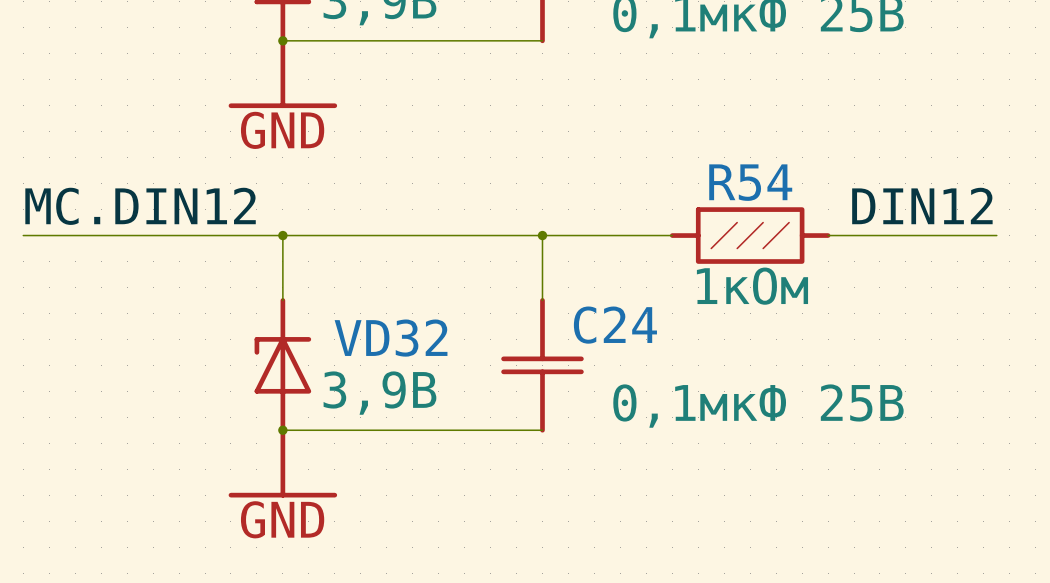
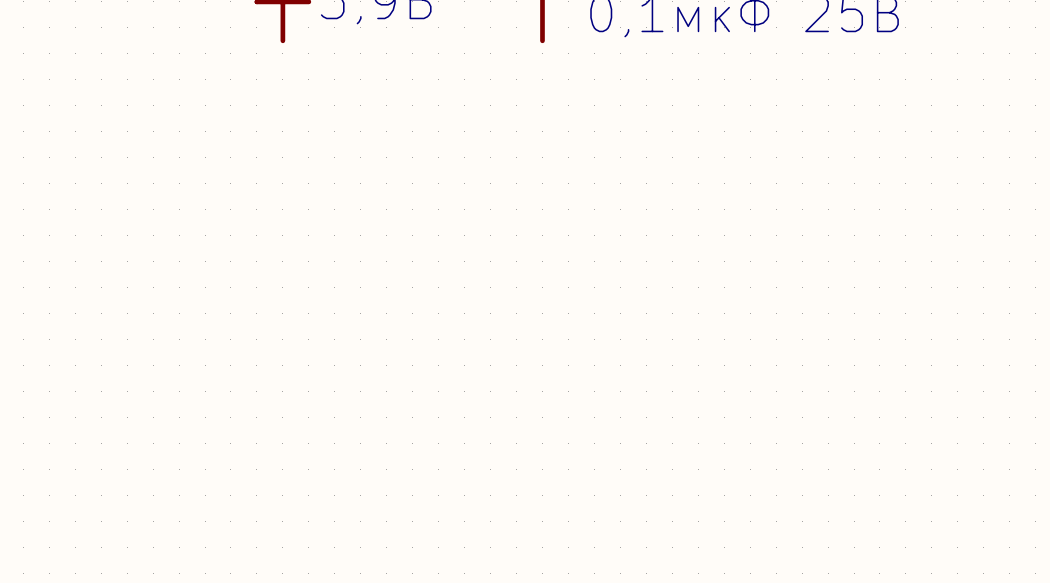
wire: (282, 40) (542, 40) -> none
junction: (282, 40) -> none
power symbol: (282, 73) -> none
label: DIN12 (922, 205) -> none
label: MC.DIN12 (140, 206) -> none
wire: (23, 235) (672, 235) -> none
wire: (282, 235) (282, 300) -> none
junction: (282, 235) -> none
wire: (542, 235) (542, 300) -> none
junction: (542, 235) -> none
R54: (750, 235) -> none
wire: (828, 235) (996, 235) -> none
VD32: (282, 365) -> none
C24: (542, 365) -> none
wire: (282, 430) (542, 430) -> none
junction: (282, 430) -> none
power symbol: (282, 462) -> none

